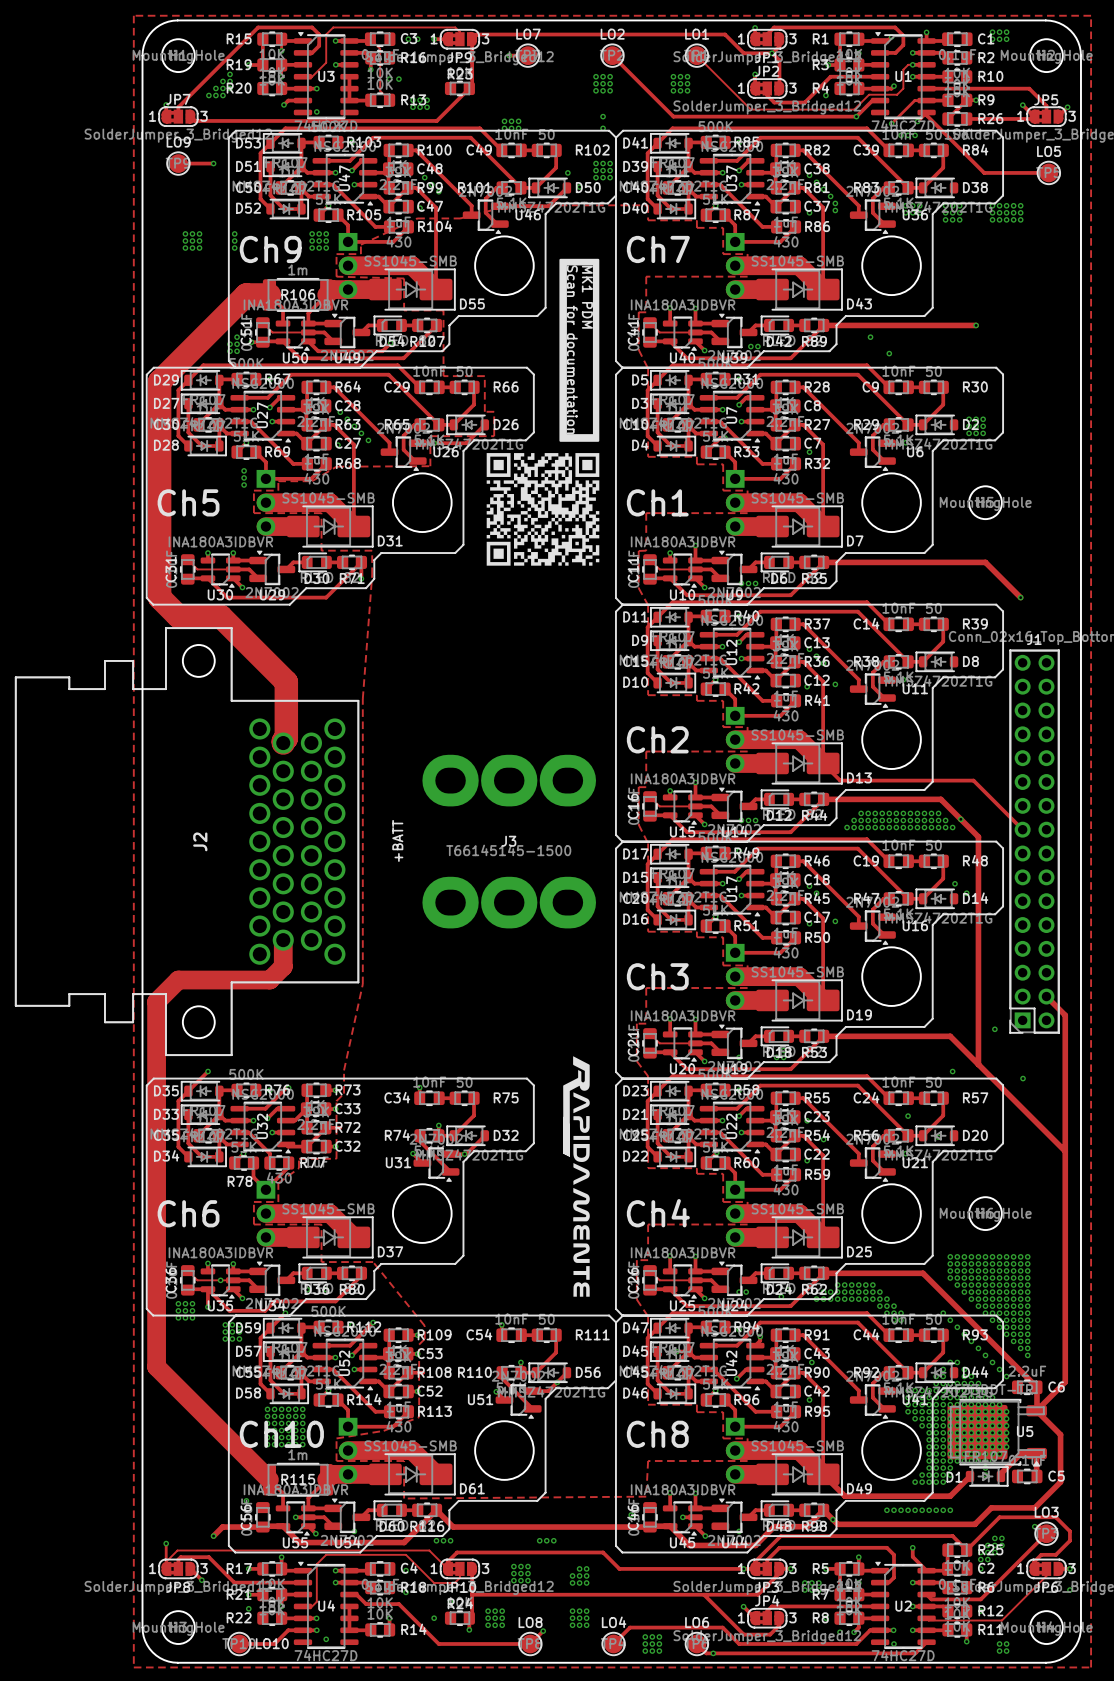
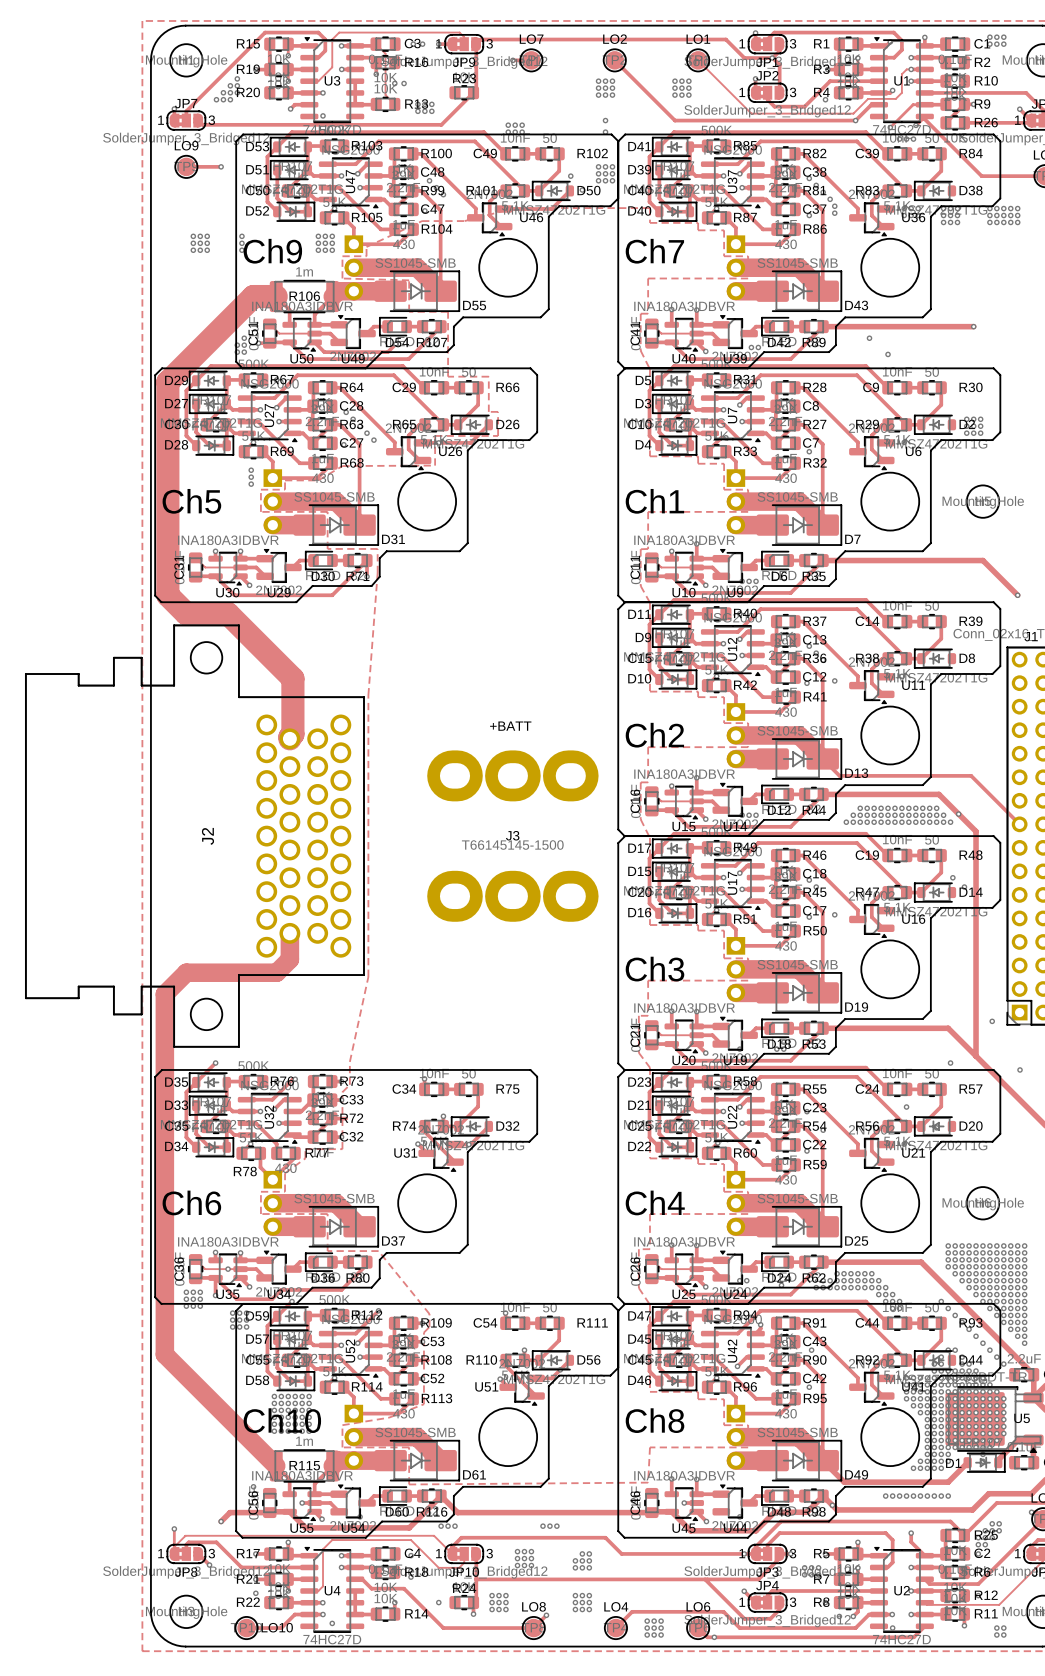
drawing: [486, 258, 600, 566] -> none
text: MK1 PDM (587, 297) -> none
text: Scan for documentation (572, 349) -> none
J3 text rotation: 0° (397, 840) -> 90° clockwise (510, 726)
J3 text position: +BATT (397, 840) -> +BATT (510, 726)
drawing: [563, 1056, 590, 1297] -> none

